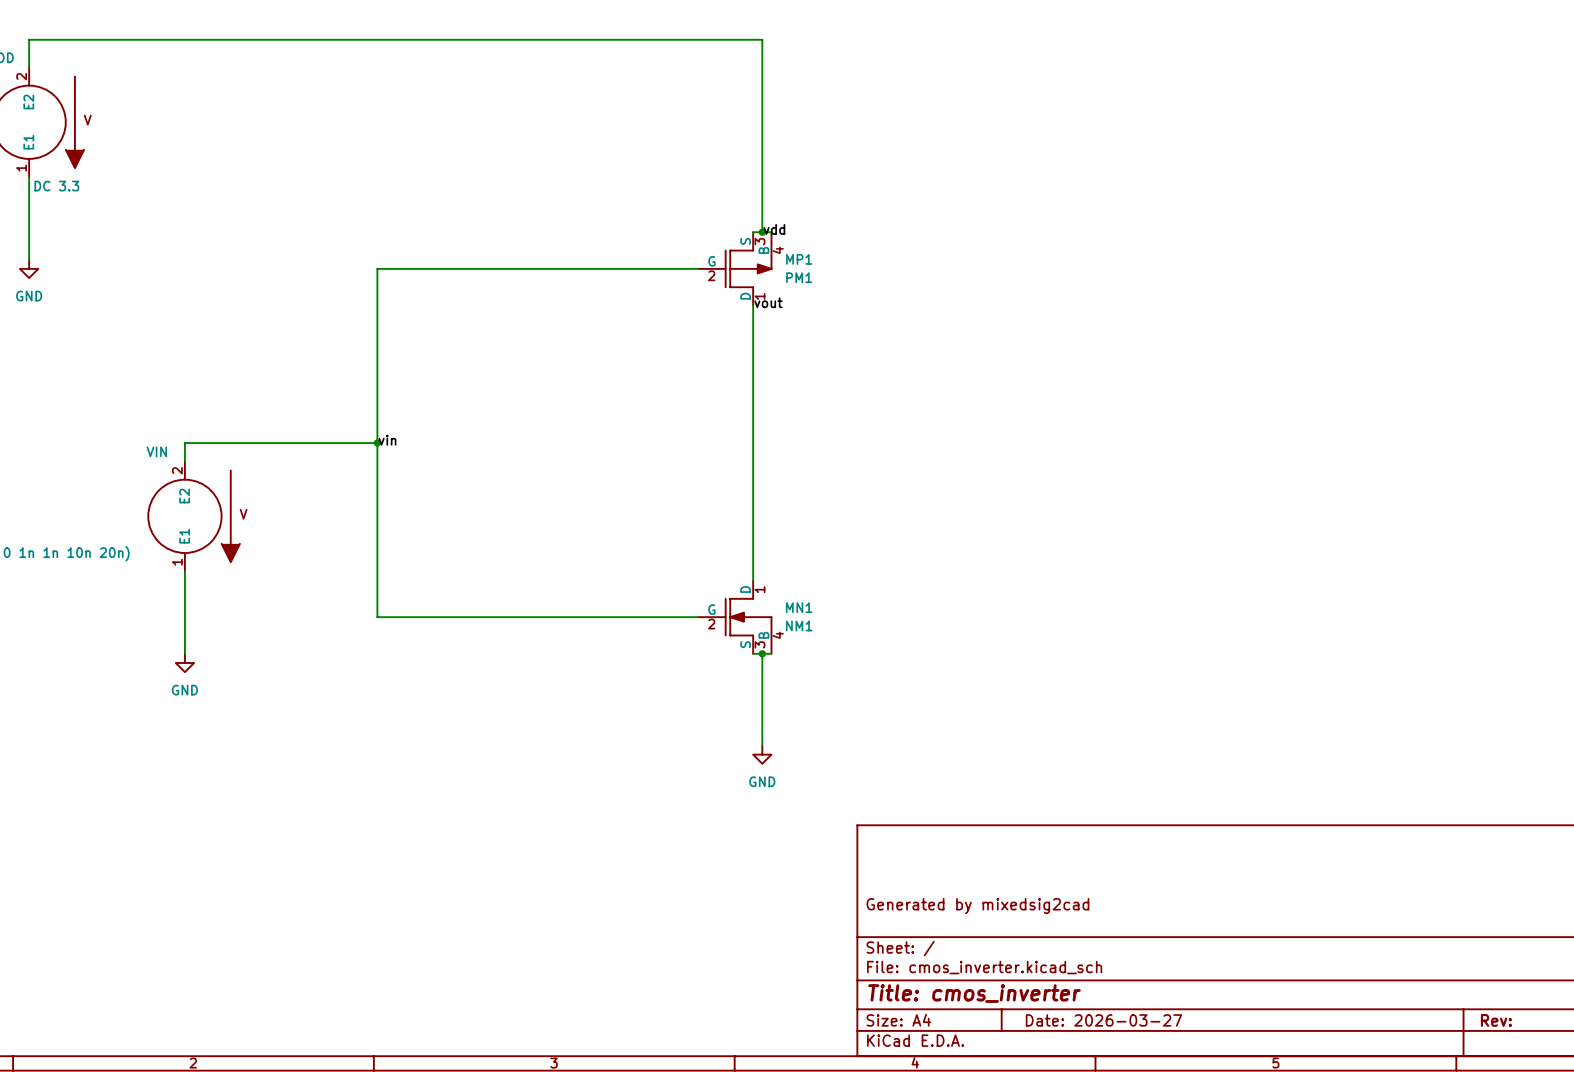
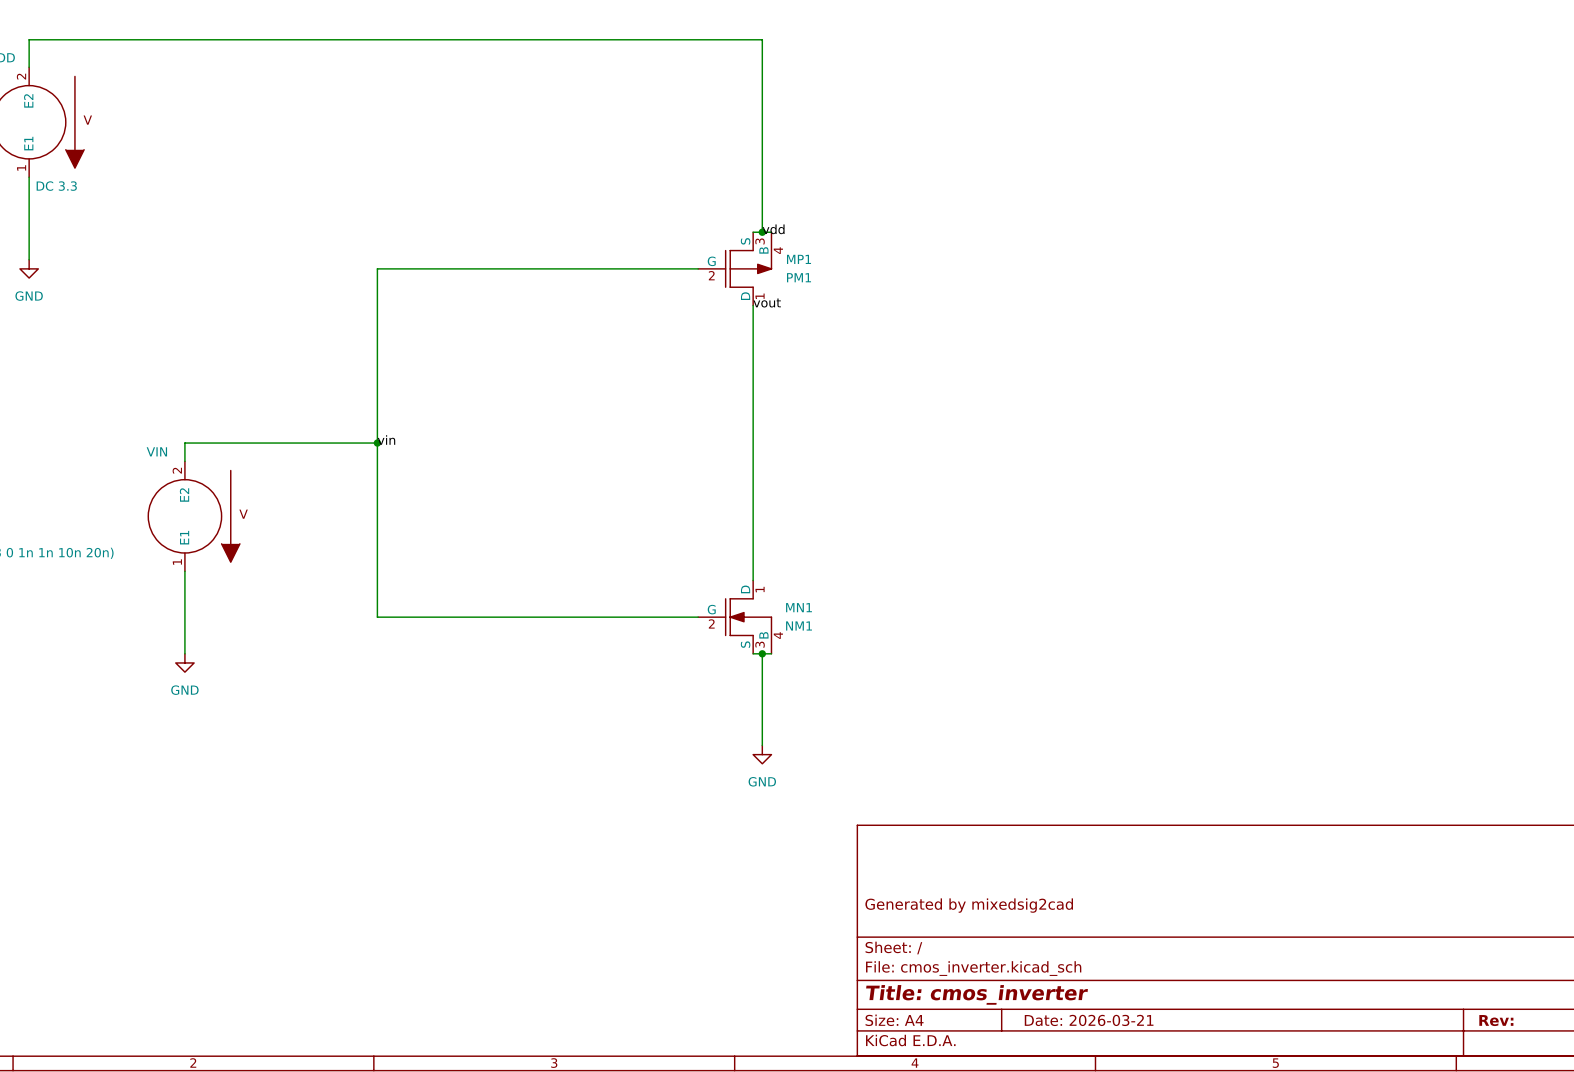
title block: Date: 2026-03-27 (1103, 1020) -> Date: 2026-03-21 (1089, 1020)

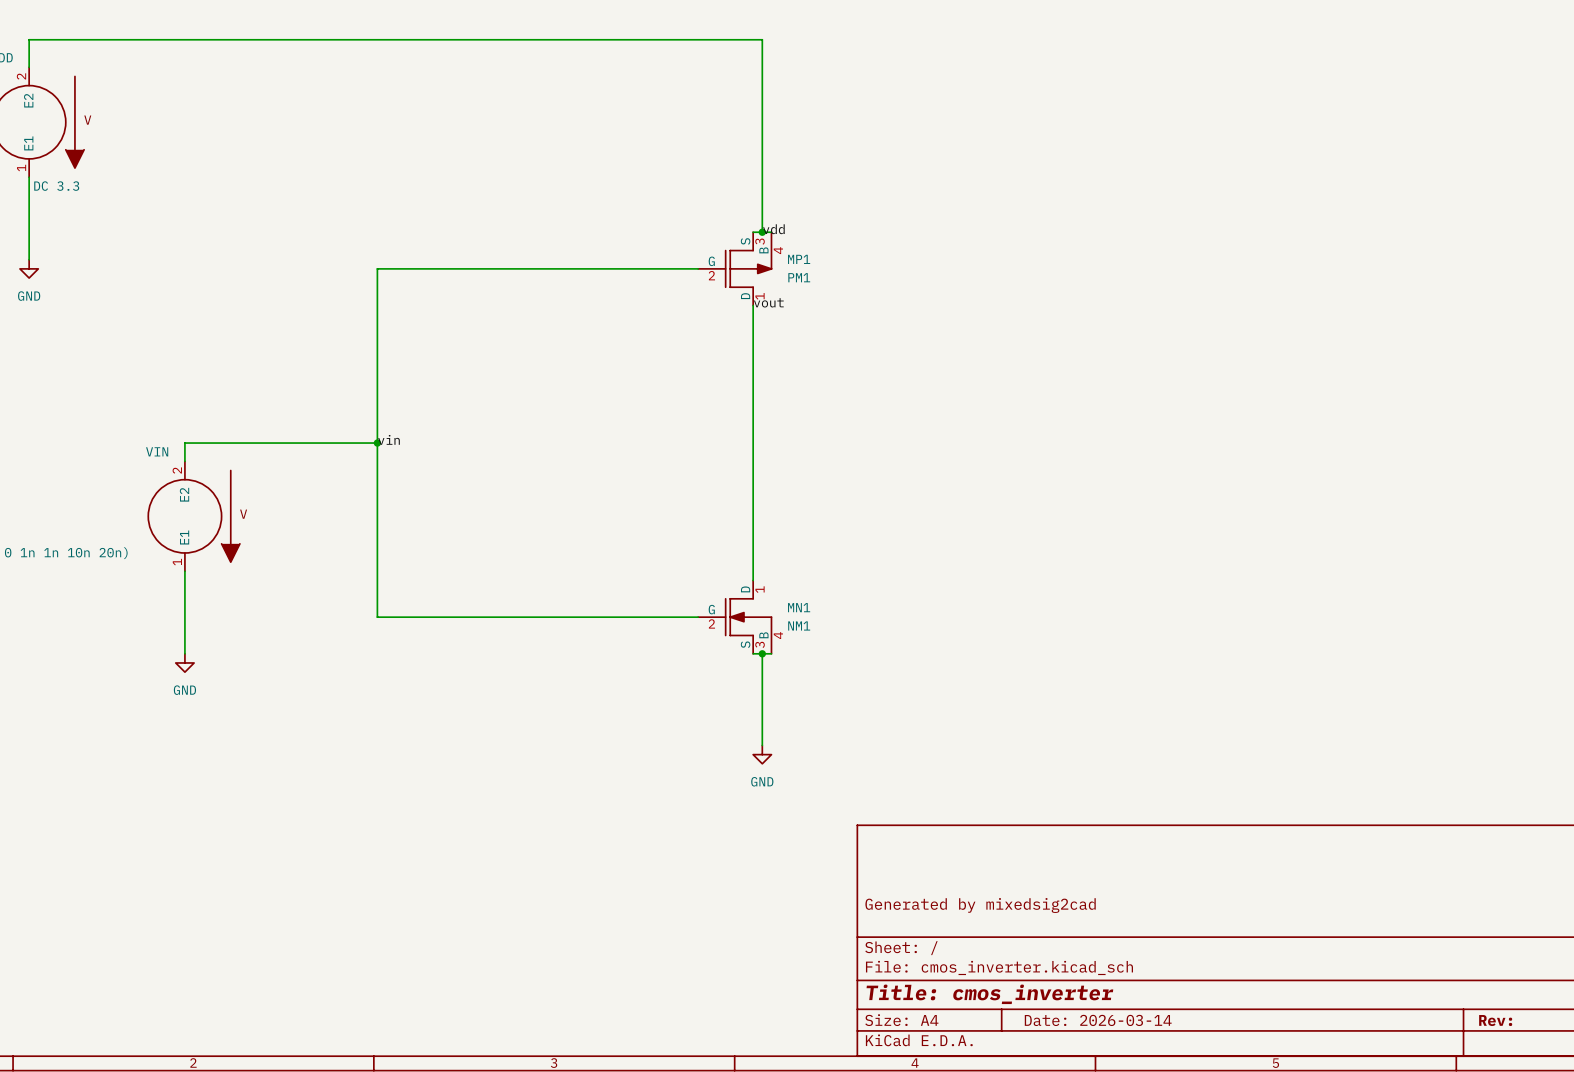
title block: Date: 2026-03-21 (1089, 1020) -> Date: 2026-03-14 (1098, 1020)

